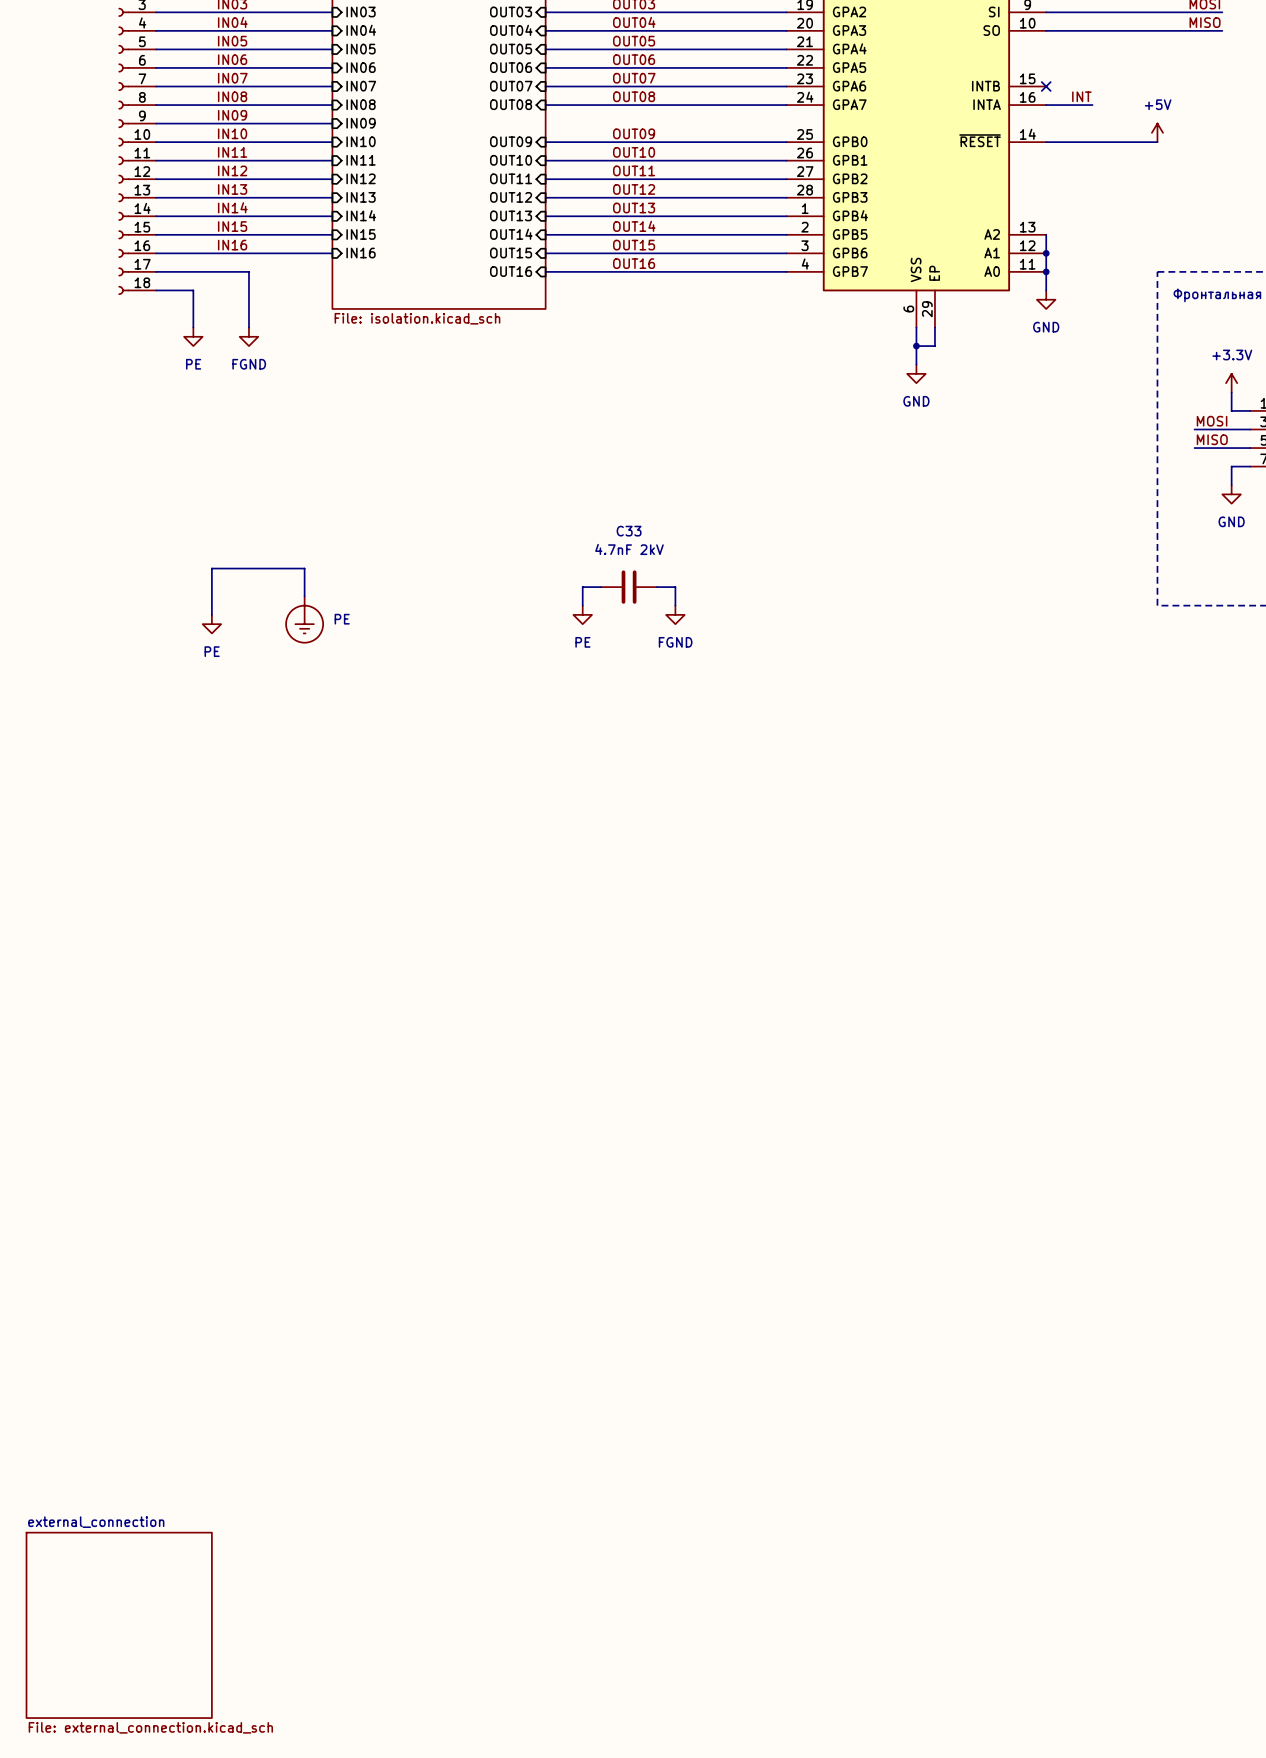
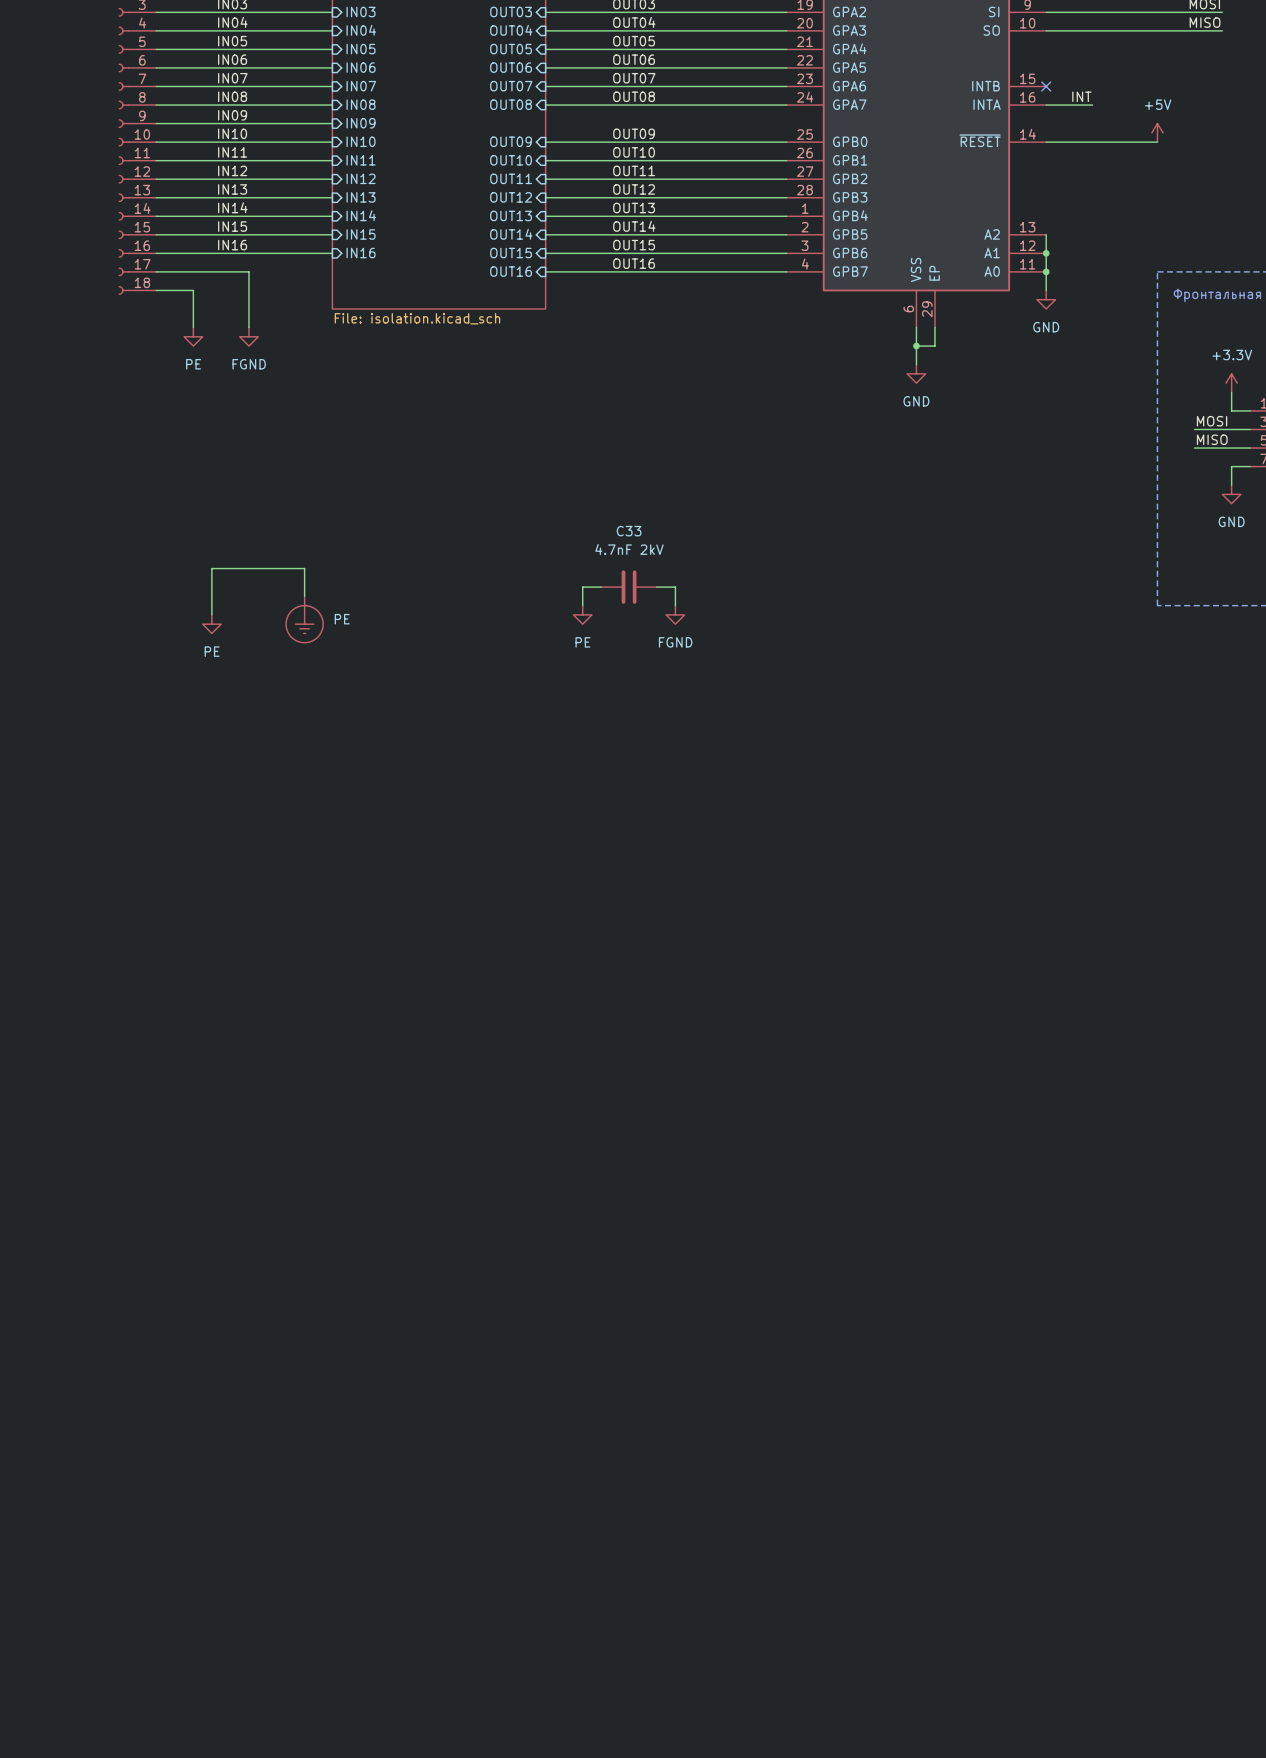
sheet external_connection: File: external_connection.kicad_sch (119, 1625) -> none

